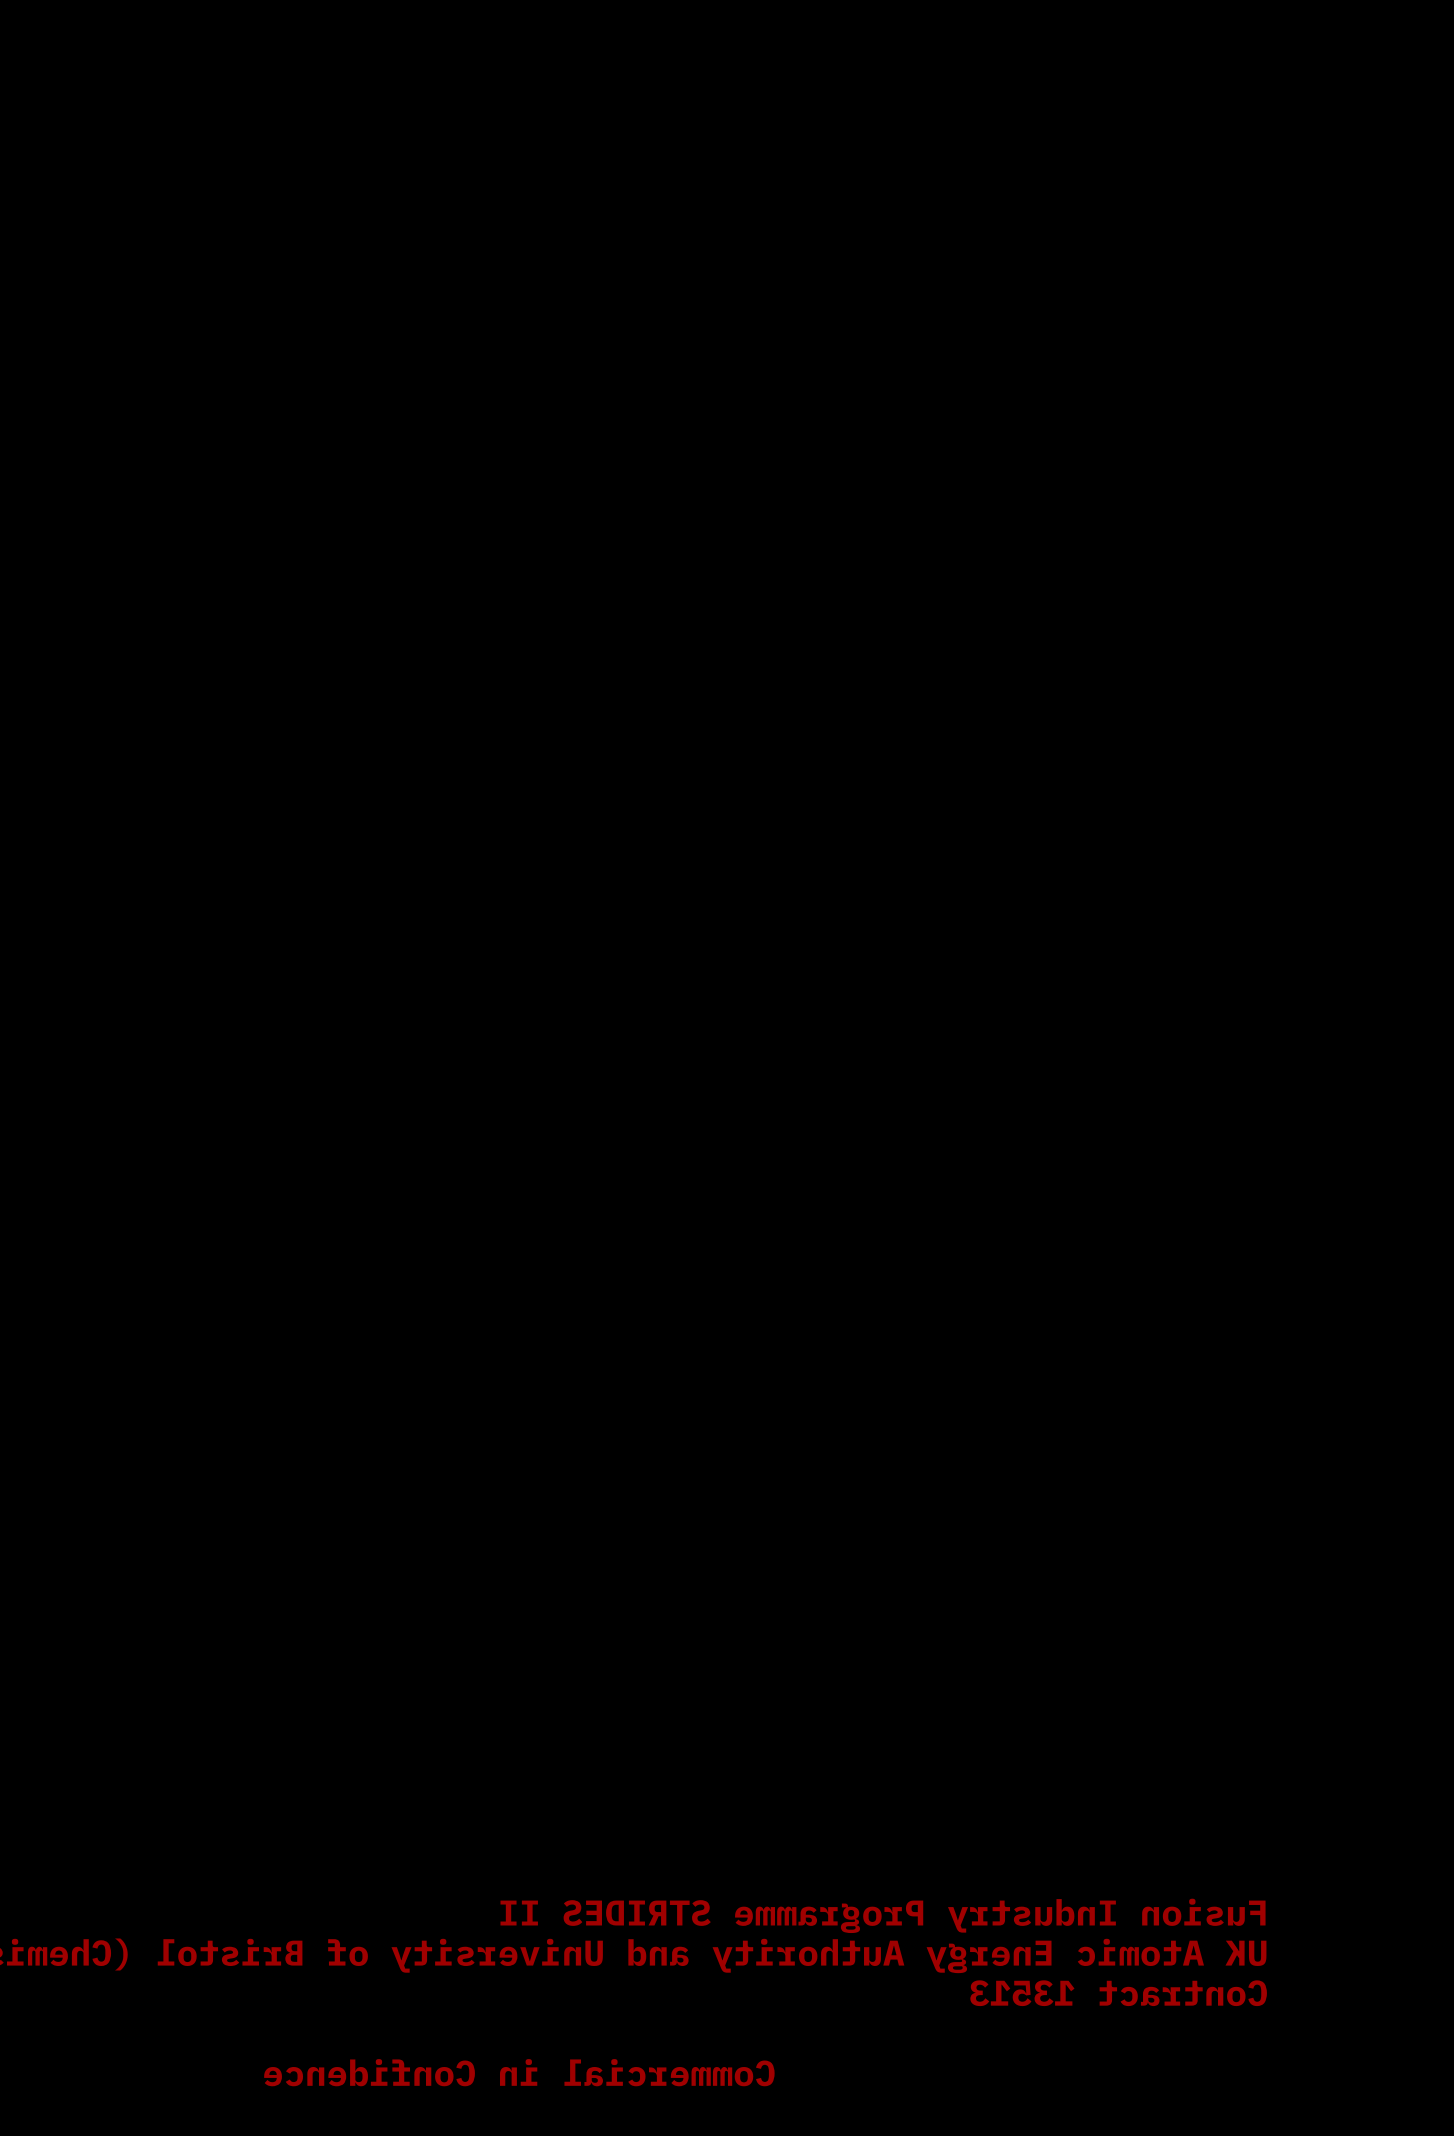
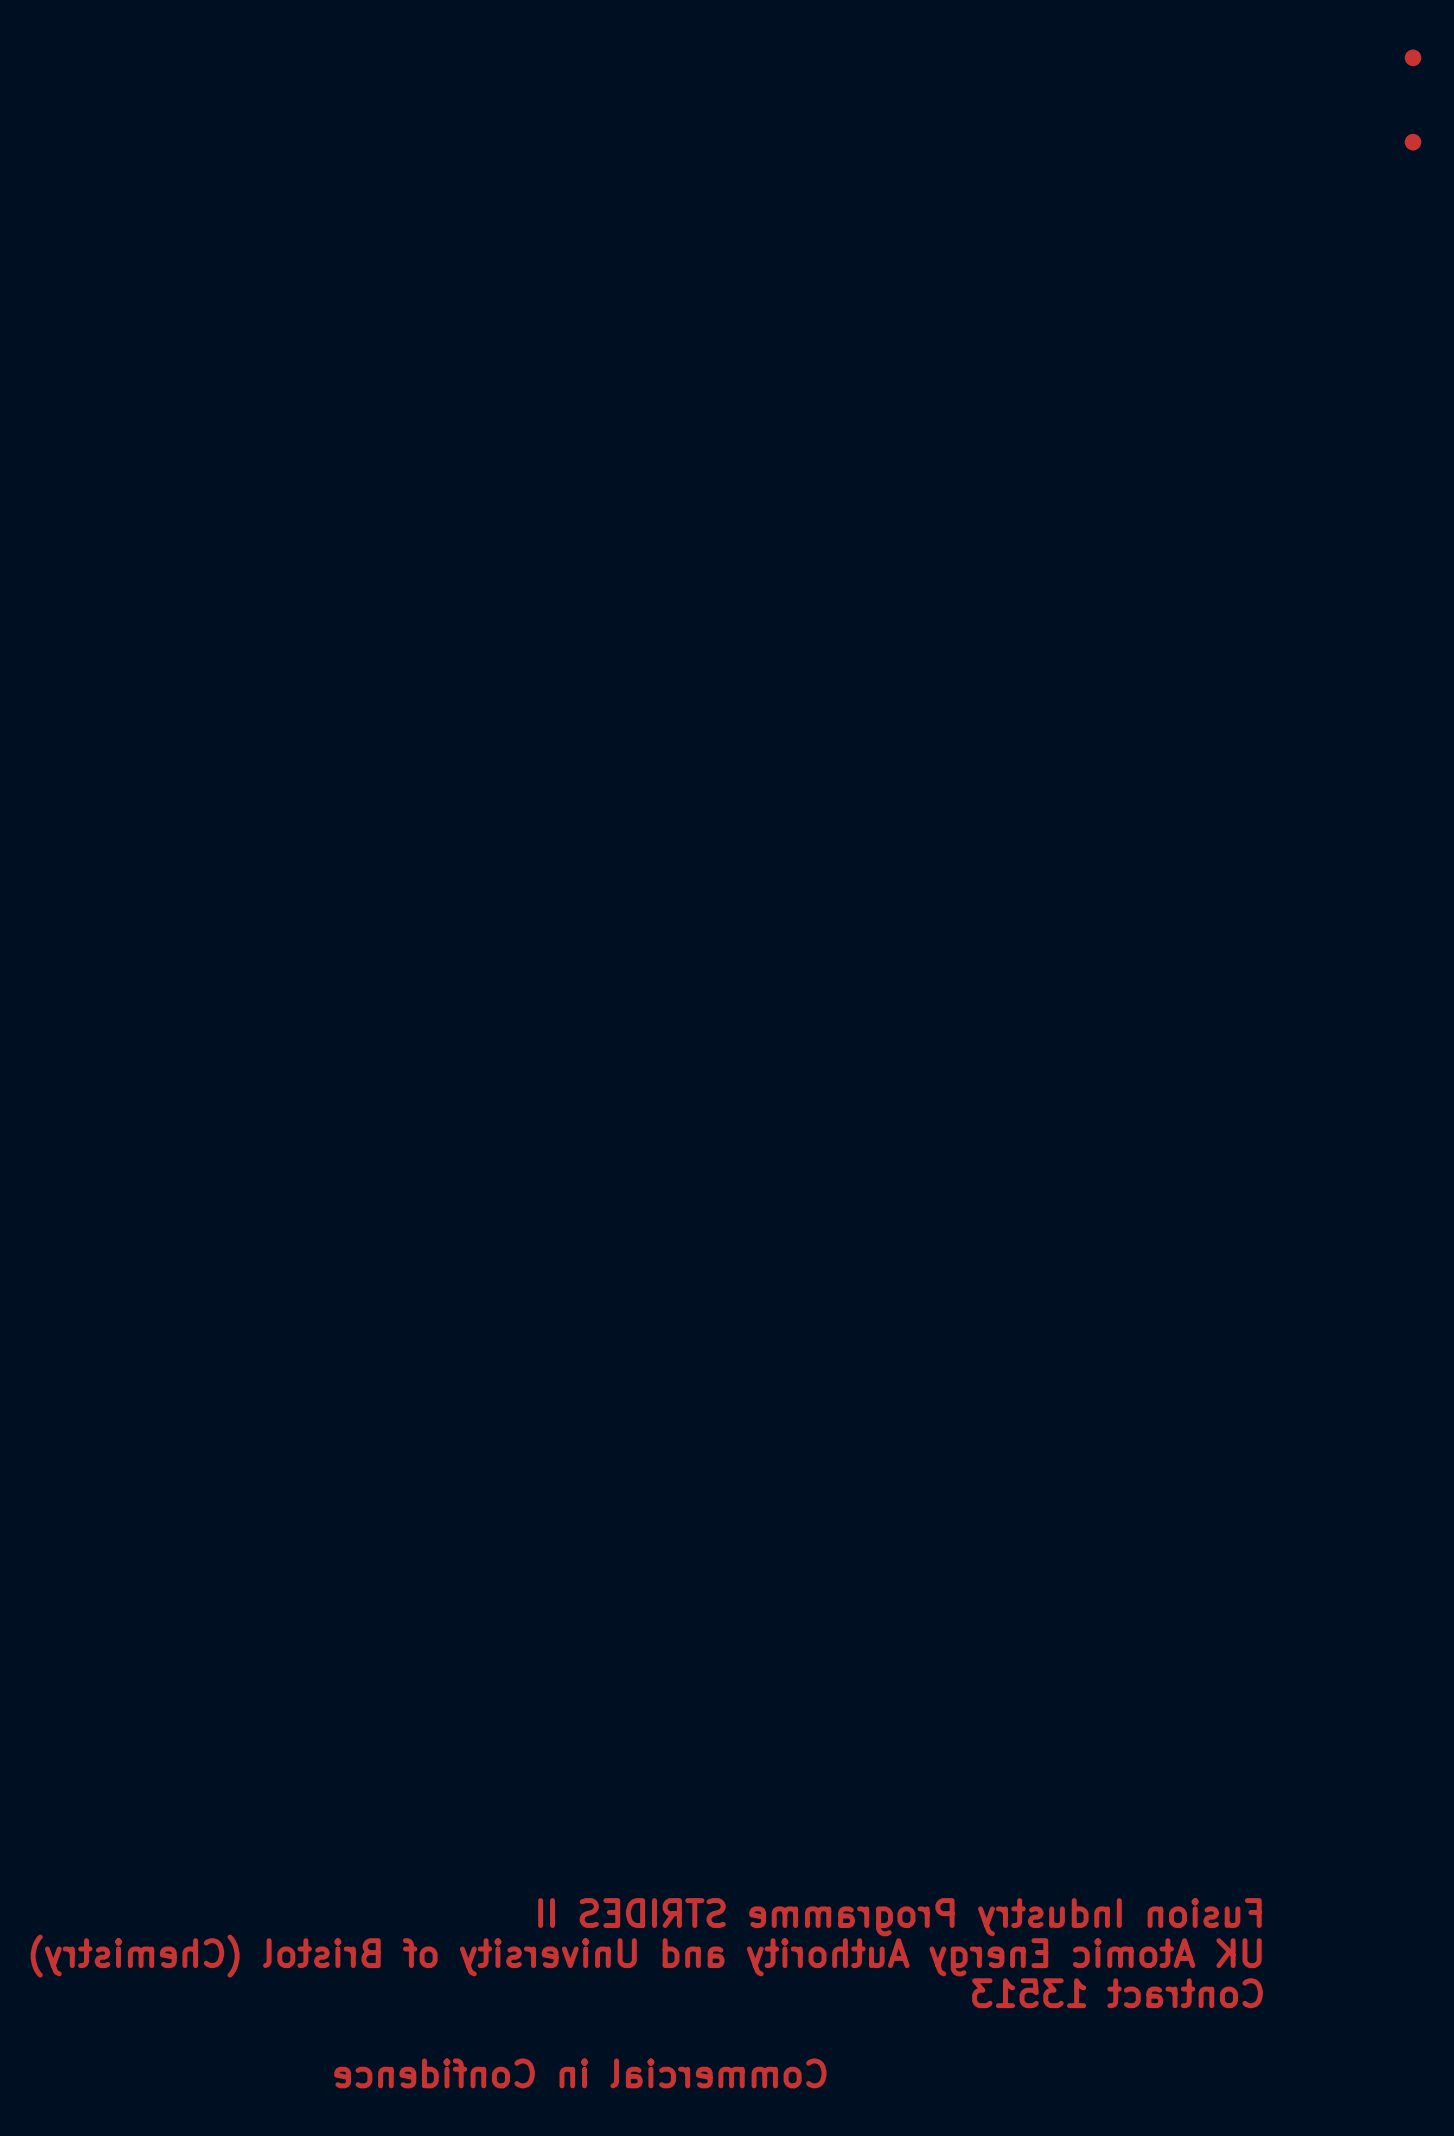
part: none -> (1413, 57)
part: none -> (1413, 142)

